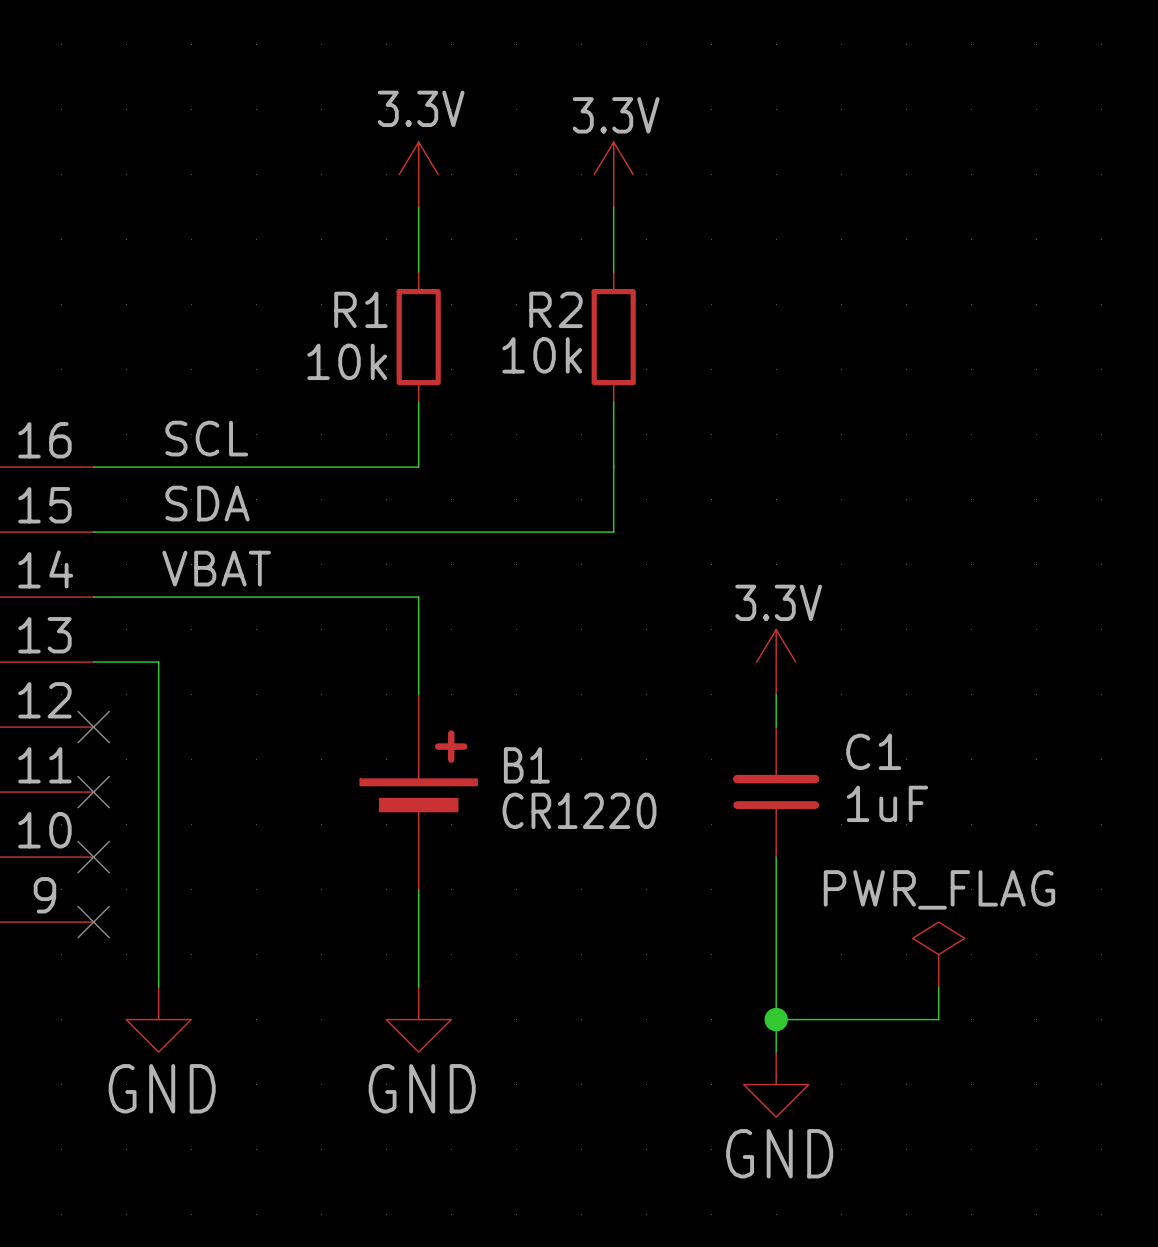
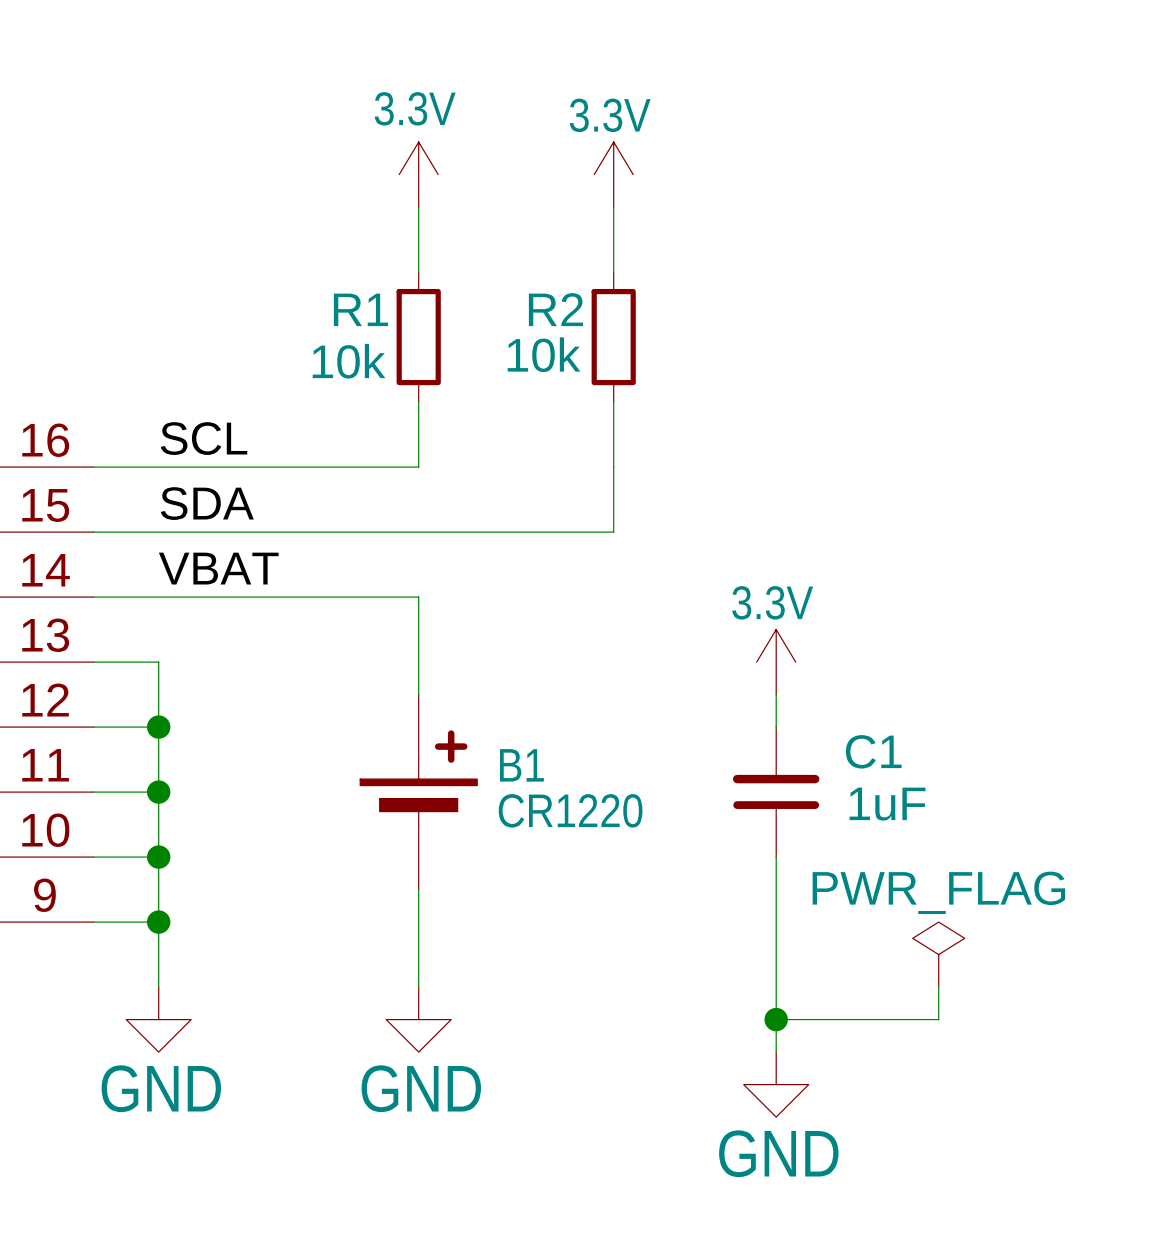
wire: none -> (93, 727) (158, 727)
no-connect mark: (93, 727) -> none
junction: none -> (158, 727)
wire: none -> (93, 792) (158, 792)
no-connect mark: (93, 792) -> none
junction: none -> (158, 792)
wire: none -> (93, 857) (158, 857)
no-connect mark: (93, 857) -> none
junction: none -> (158, 857)
wire: none -> (93, 922) (158, 922)
no-connect mark: (93, 922) -> none
junction: none -> (158, 922)

